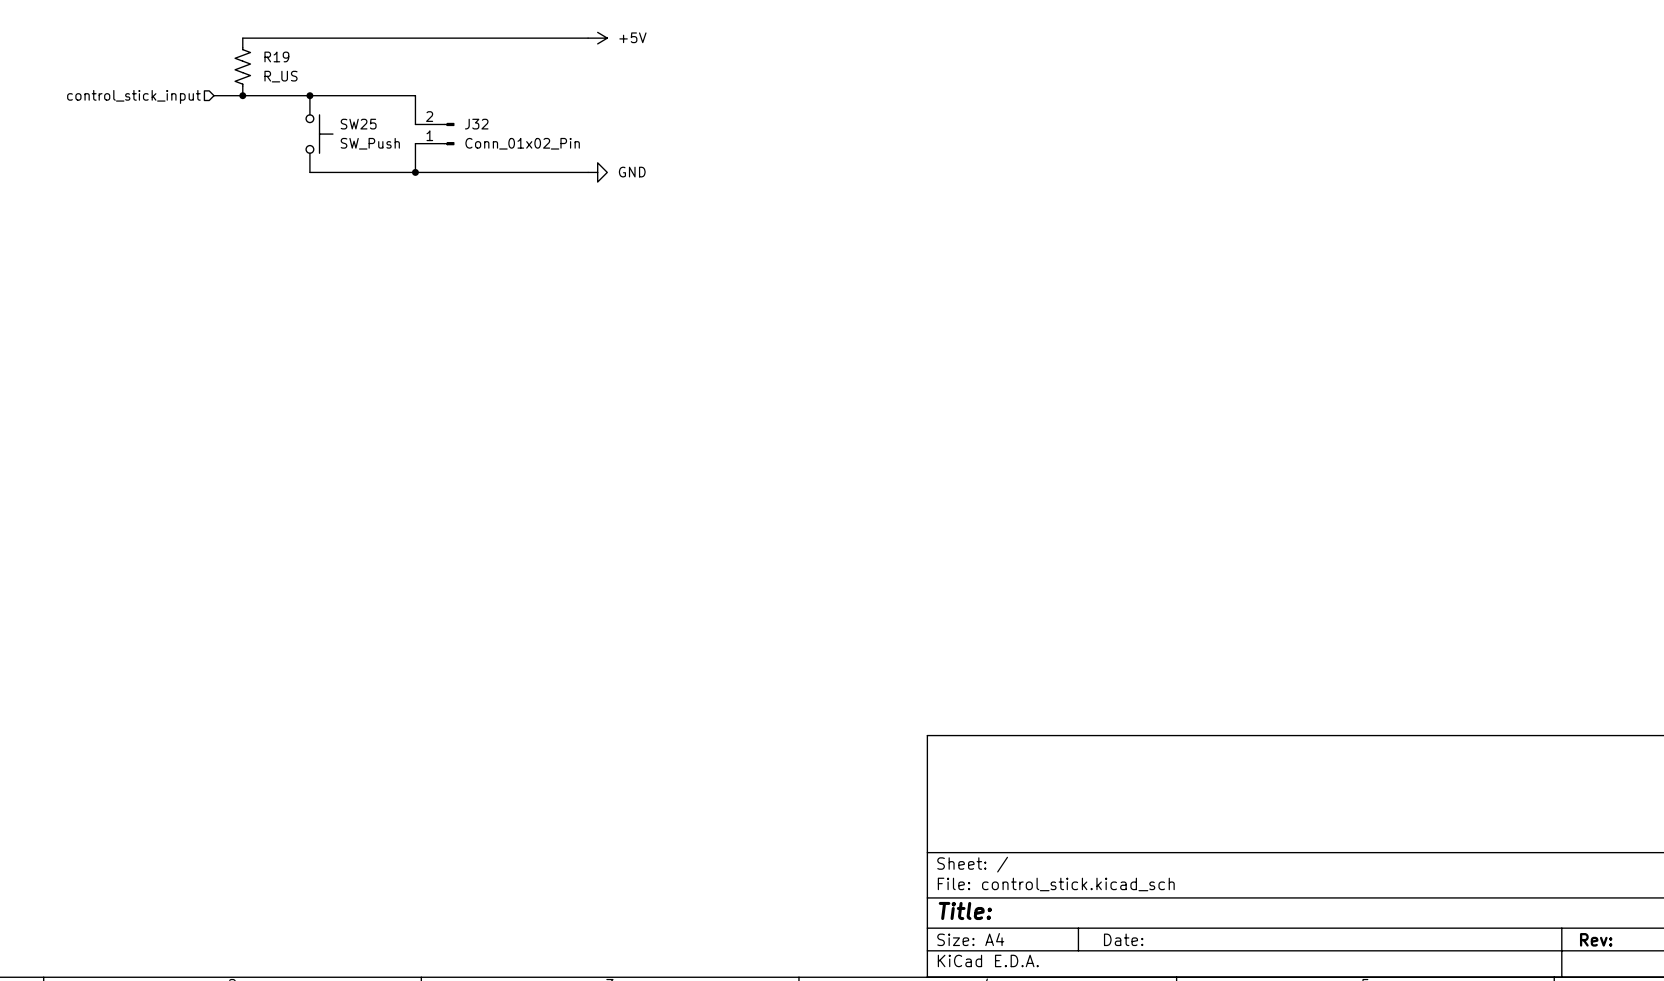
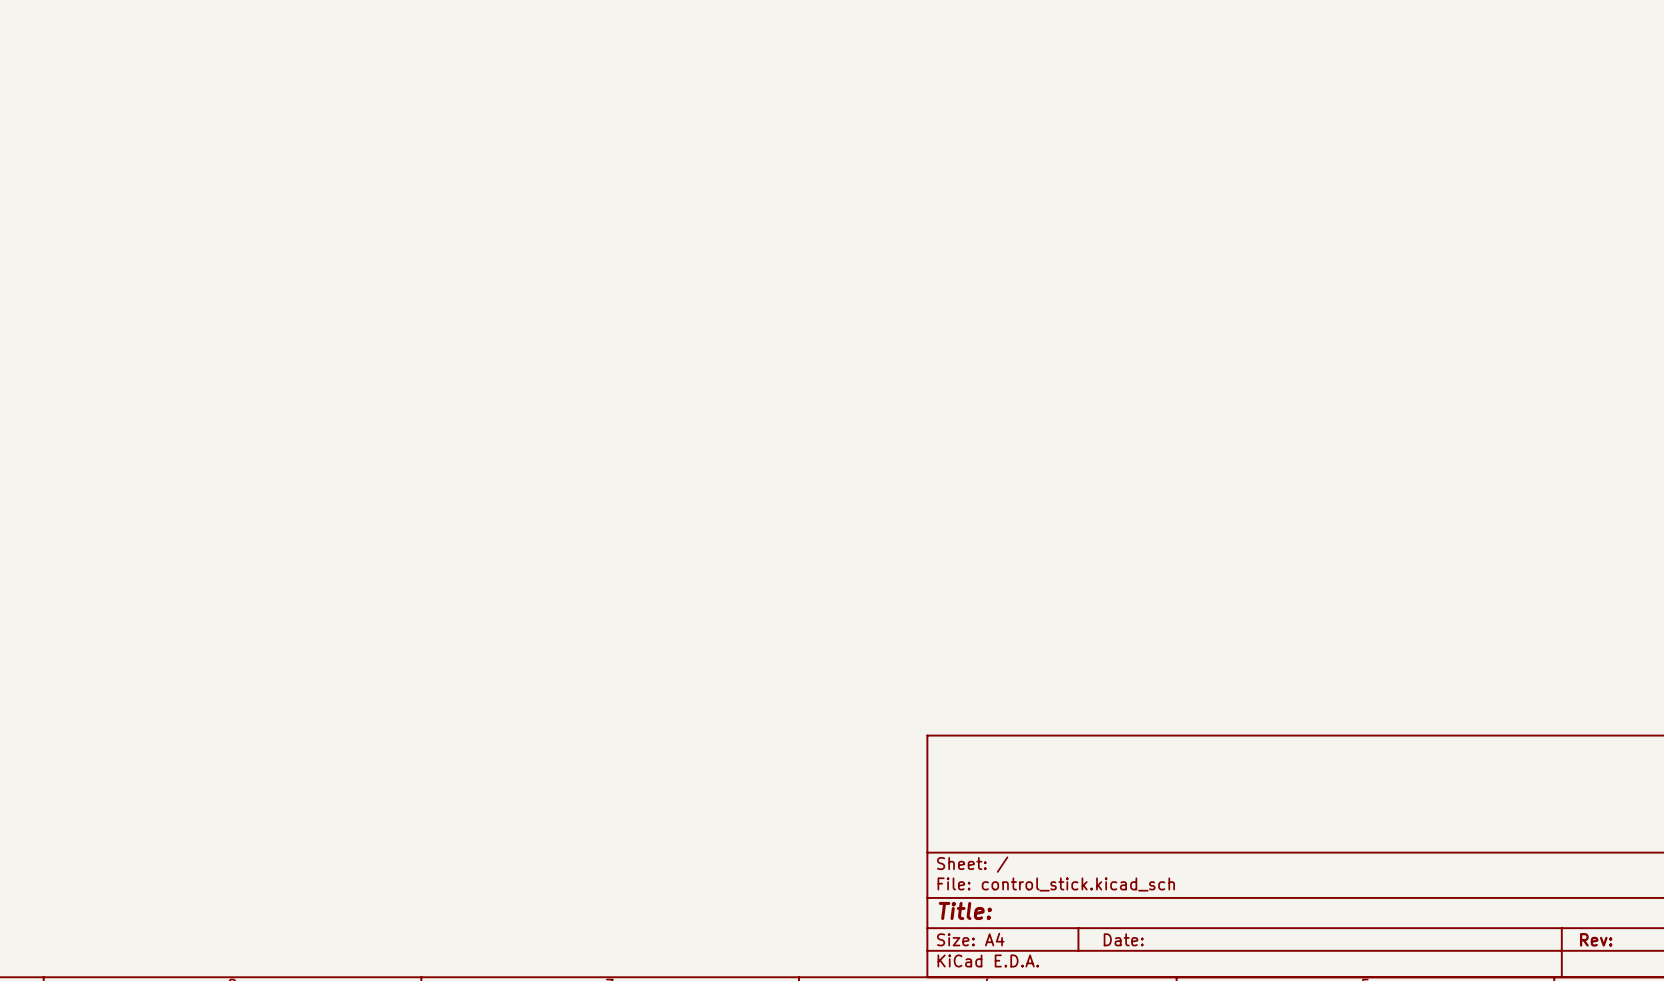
wire: (242, 38) (588, 38) -> none
power symbol: +5V (597, 38) -> none
R19: R_US (242, 66) -> none
wire: (214, 95) (415, 95) (415, 124) -> none
junction: (242, 95) -> none
junction: (309, 95) -> none
hierarchical label: control_stick_input (133, 96) -> none
SW25: SW_Push (319, 134) -> none
J32: Conn_01x02_Pin (434, 134) -> none
wire: (415, 143) (415, 172) -> none
wire: (309, 172) (588, 172) -> none
junction: (415, 172) -> none
power symbol: GND (597, 172) -> none

